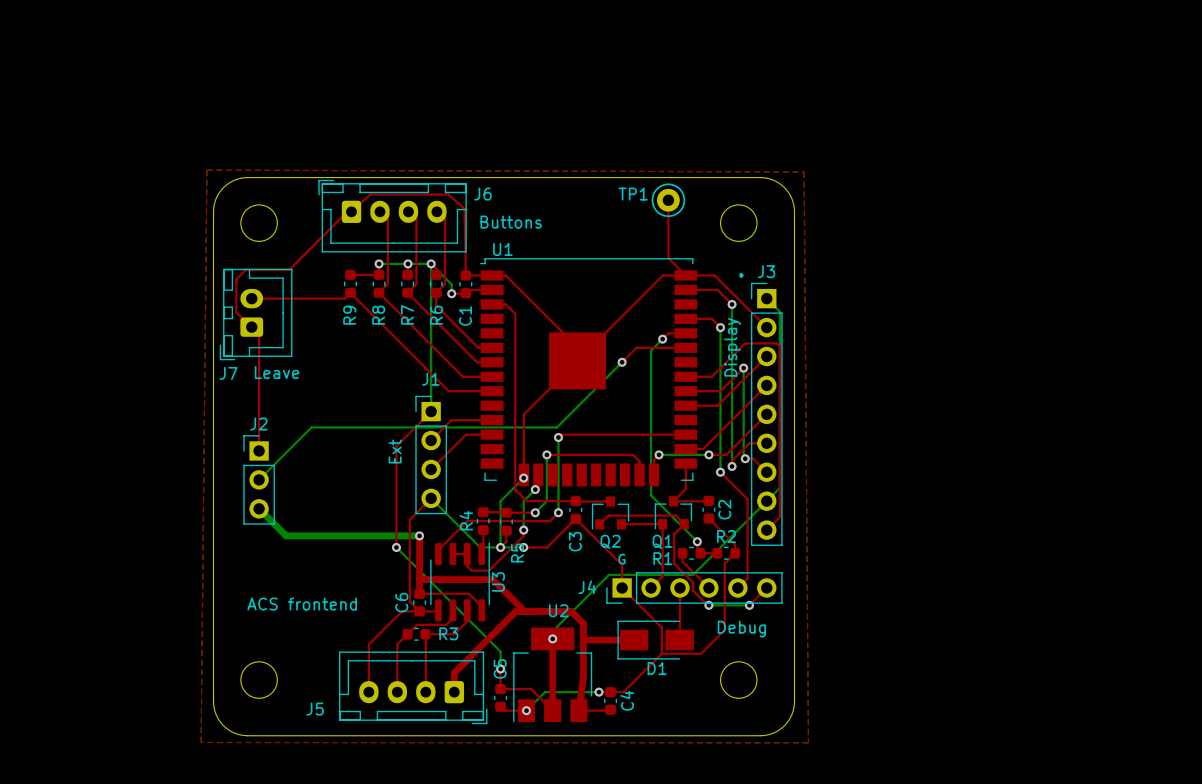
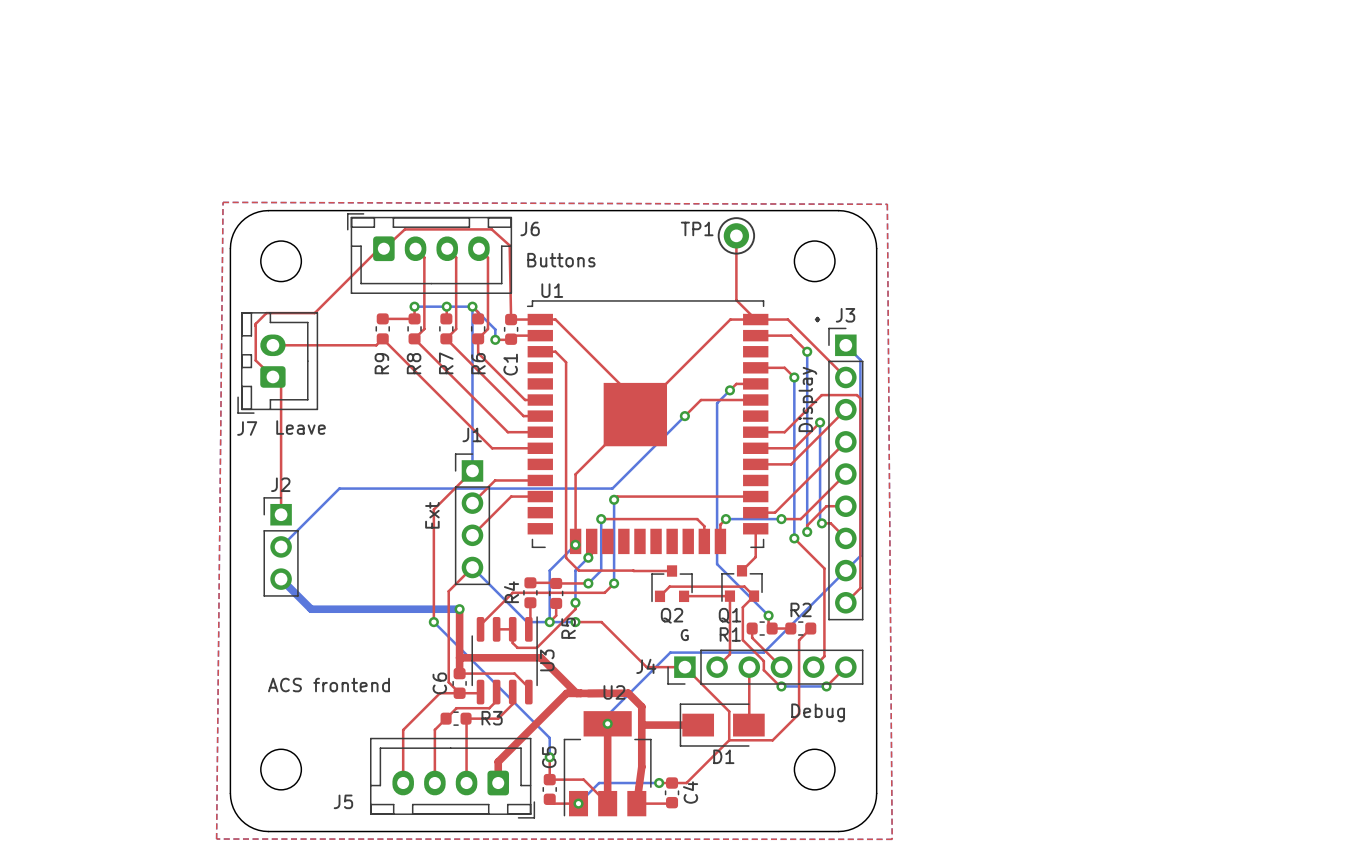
top track: (708, 500) (673, 501) -> none
C2: (708, 509) -> none
C3: (575, 510) -> none
top track: (708, 518) (735, 544) (735, 553) -> none
top track: (547, 547) (575, 518) (622, 565) (622, 587) -> (601, 622) (646, 667) (684, 667)

